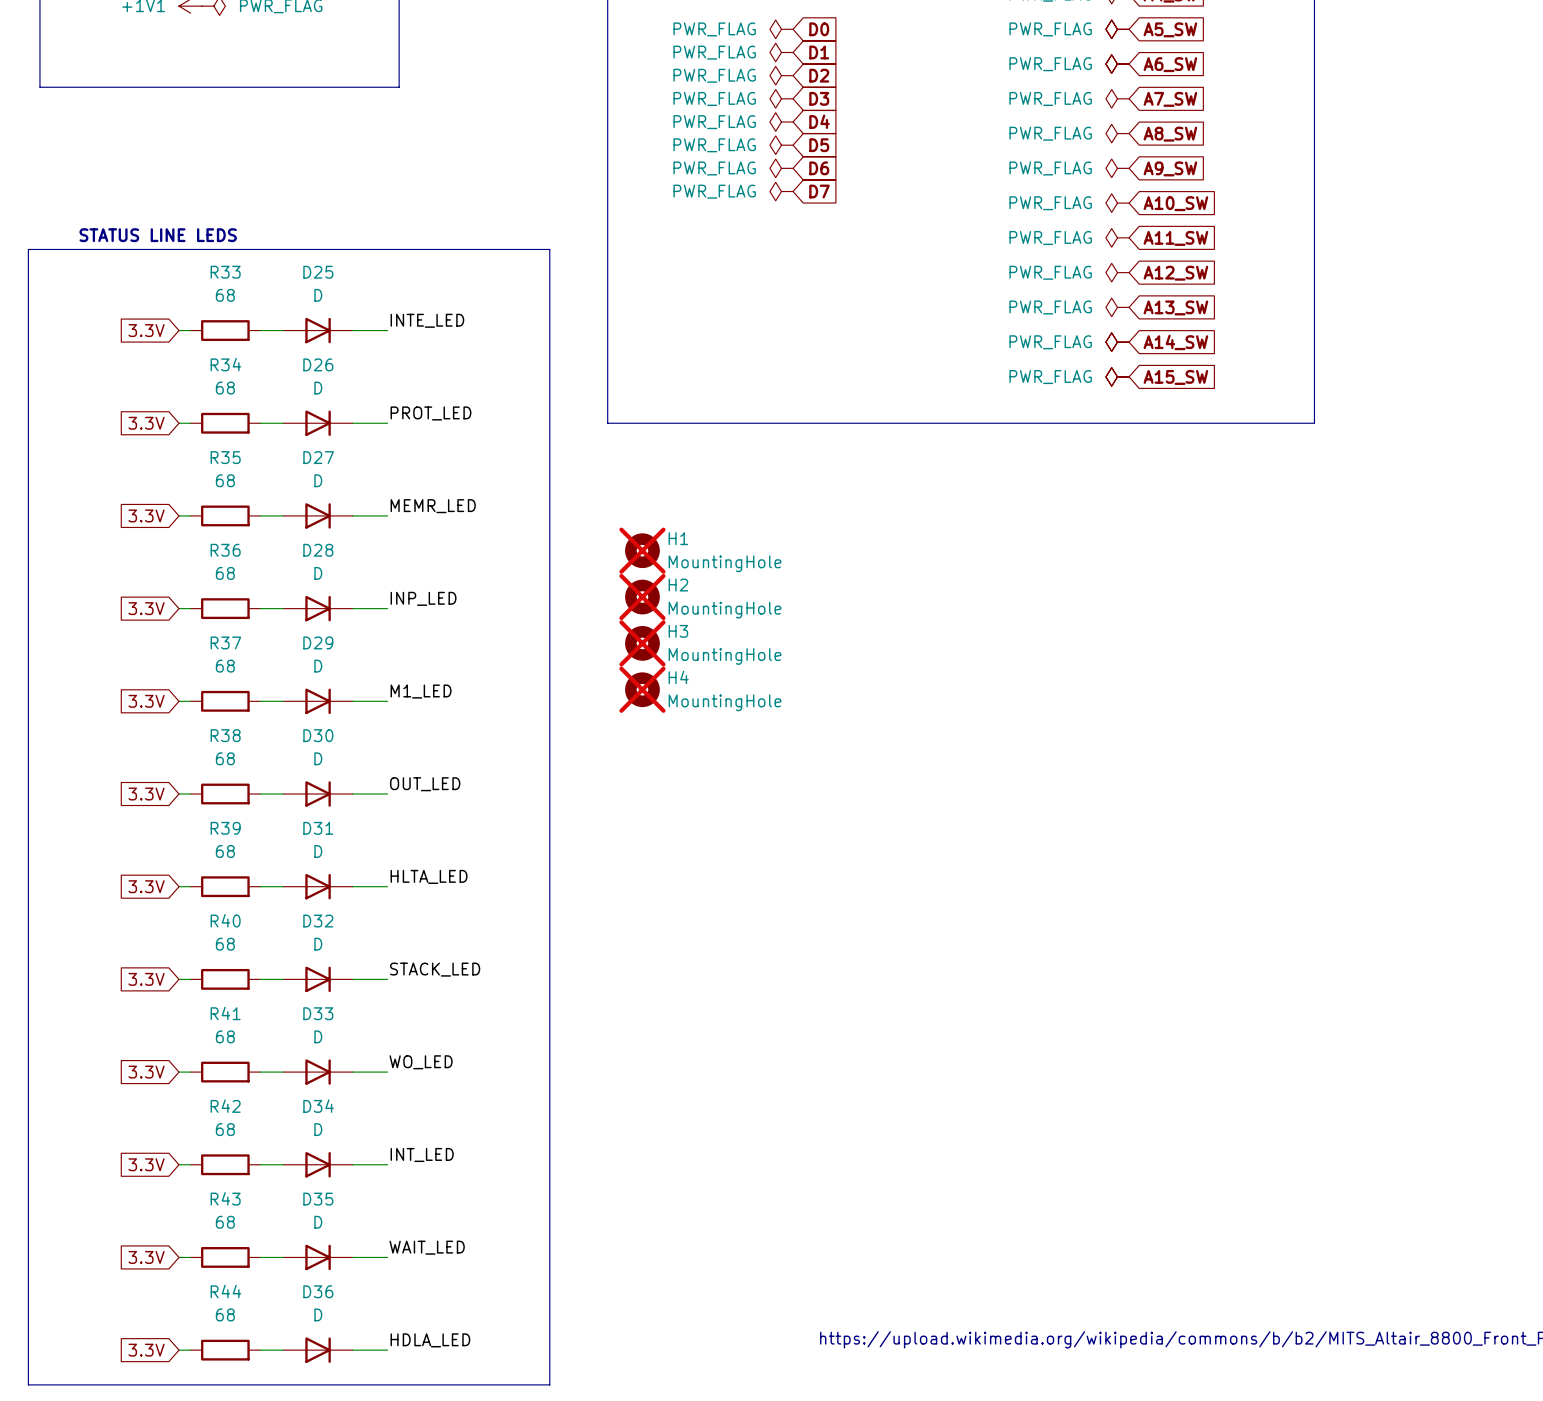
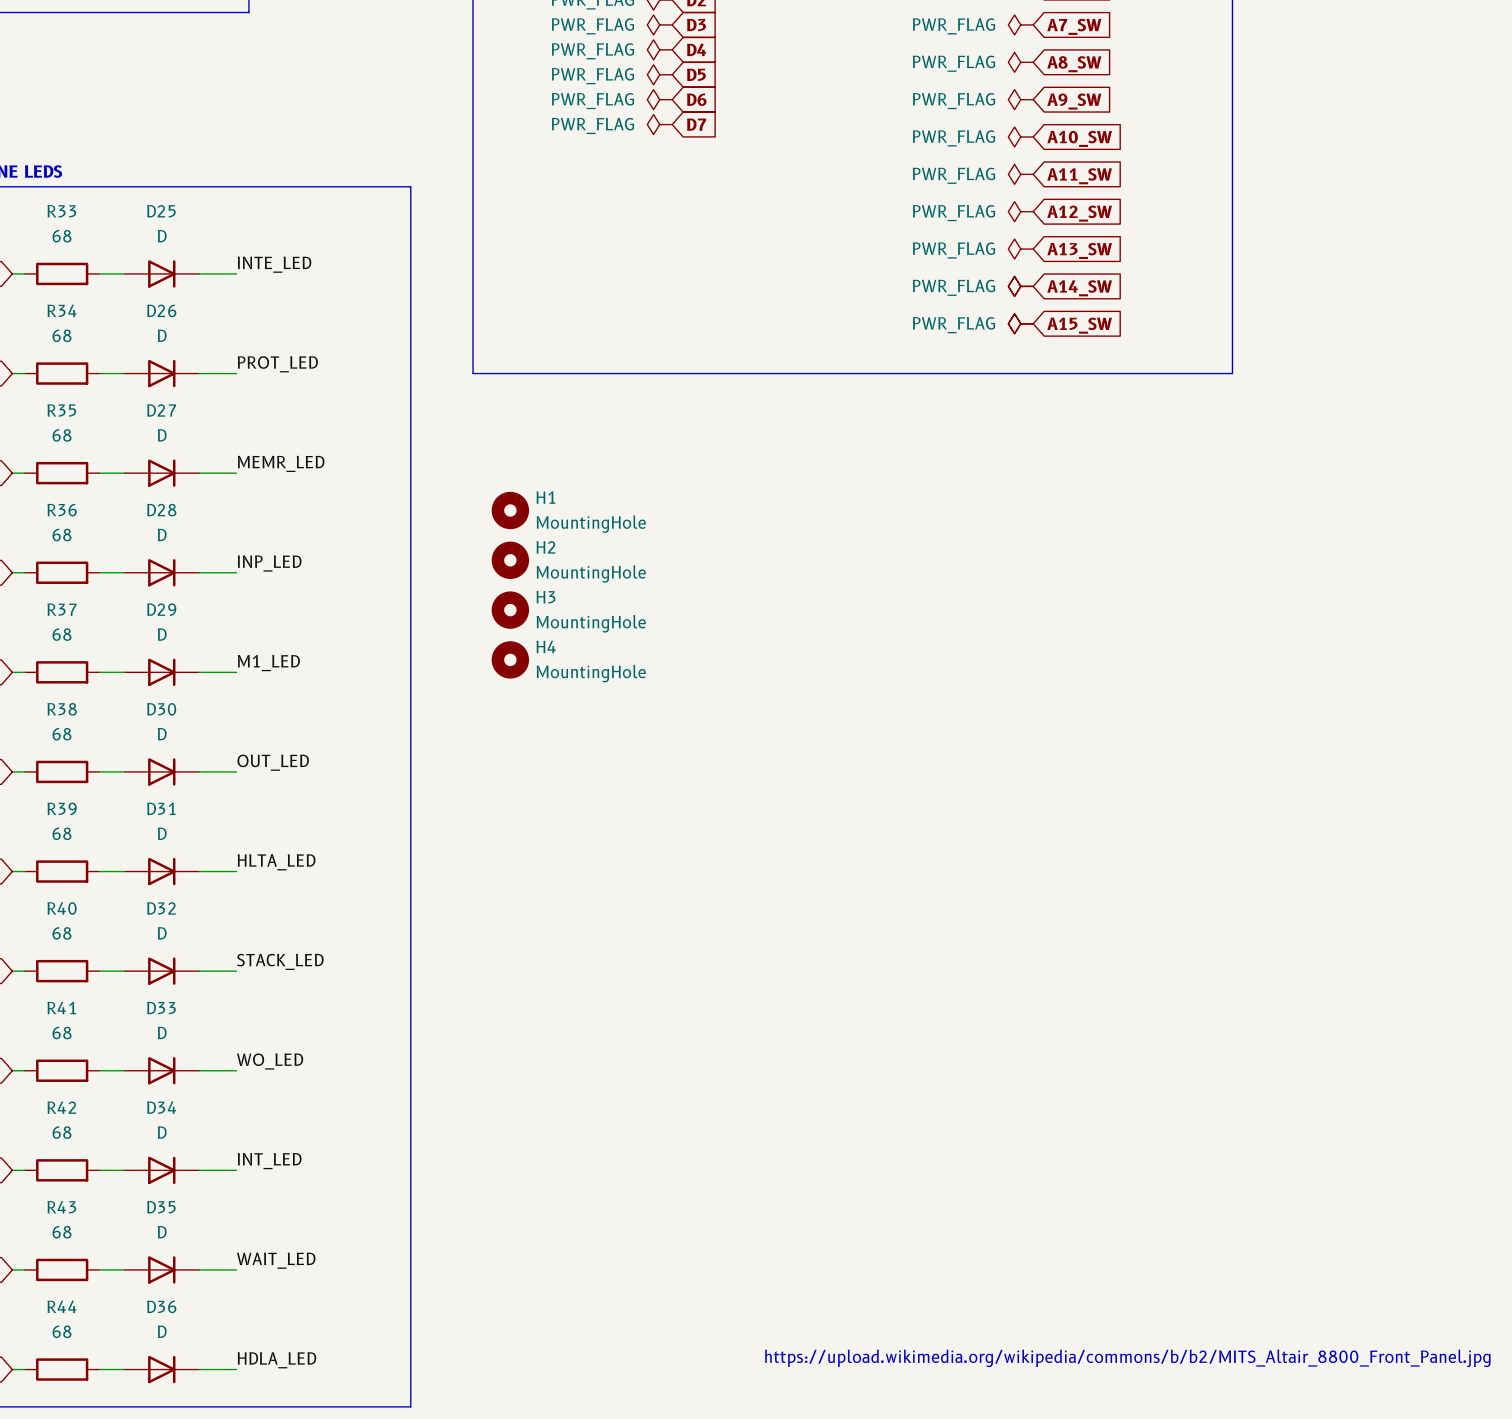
H1 do-not-place cross: (642, 550) -> none
H2 do-not-place cross: (642, 597) -> none
H3 do-not-place cross: (642, 643) -> none
H4 do-not-place cross: (642, 689) -> none

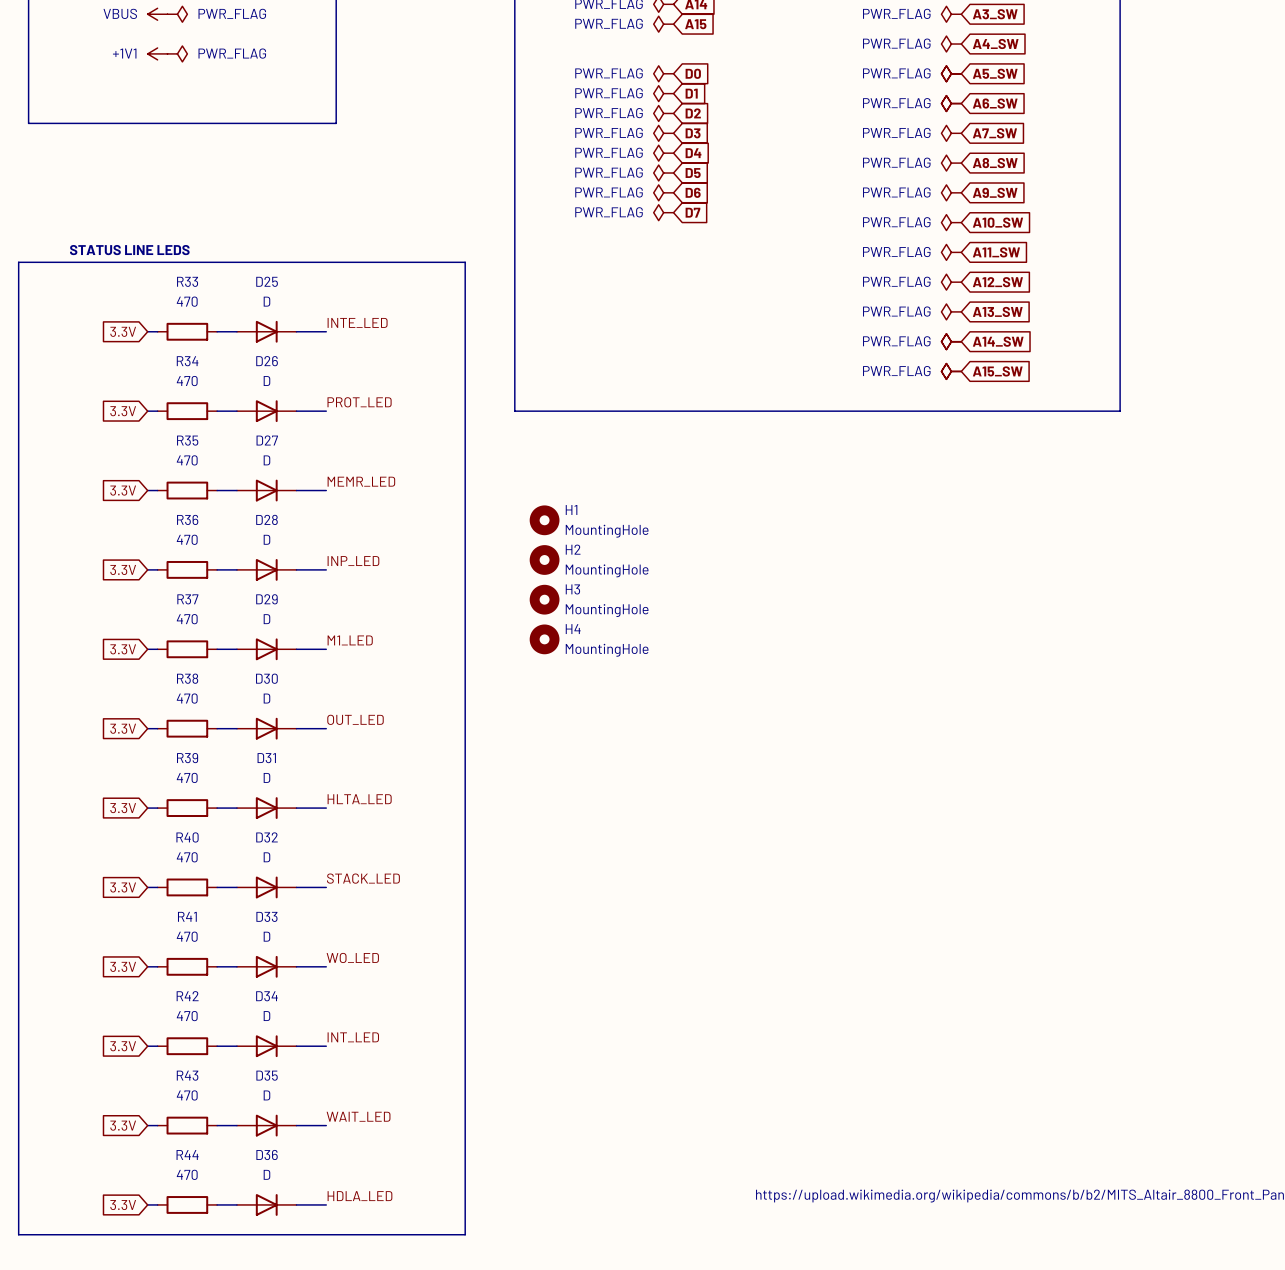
R33 value: 68 (61, 236) -> 470 (187, 301)
R34 value: 68 (61, 335) -> 470 (187, 381)
R35 value: 68 (61, 435) -> 470 (187, 460)
R36 value: 68 (61, 535) -> 470 (187, 539)
R37 value: 68 (61, 634) -> 470 (187, 619)
R38 value: 68 (61, 734) -> 470 (187, 698)
R39 value: 68 (61, 833) -> 470 (187, 777)
R40 value: 68 (61, 933) -> 470 (187, 857)
R41 value: 68 (61, 1033) -> 470 (187, 936)
R42 value: 68 (61, 1132) -> 470 (187, 1016)
R43 value: 68 (61, 1232) -> 470 (187, 1095)
R44 value: 68 (61, 1331) -> 470 (187, 1174)

